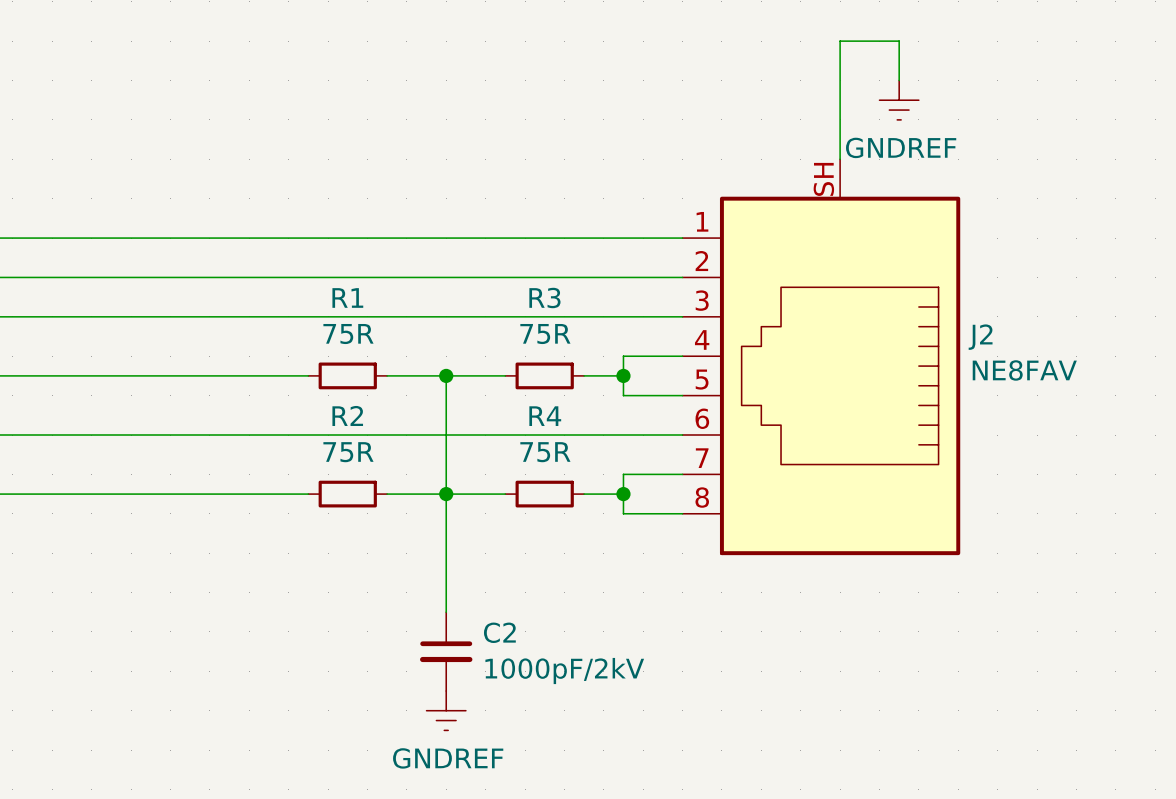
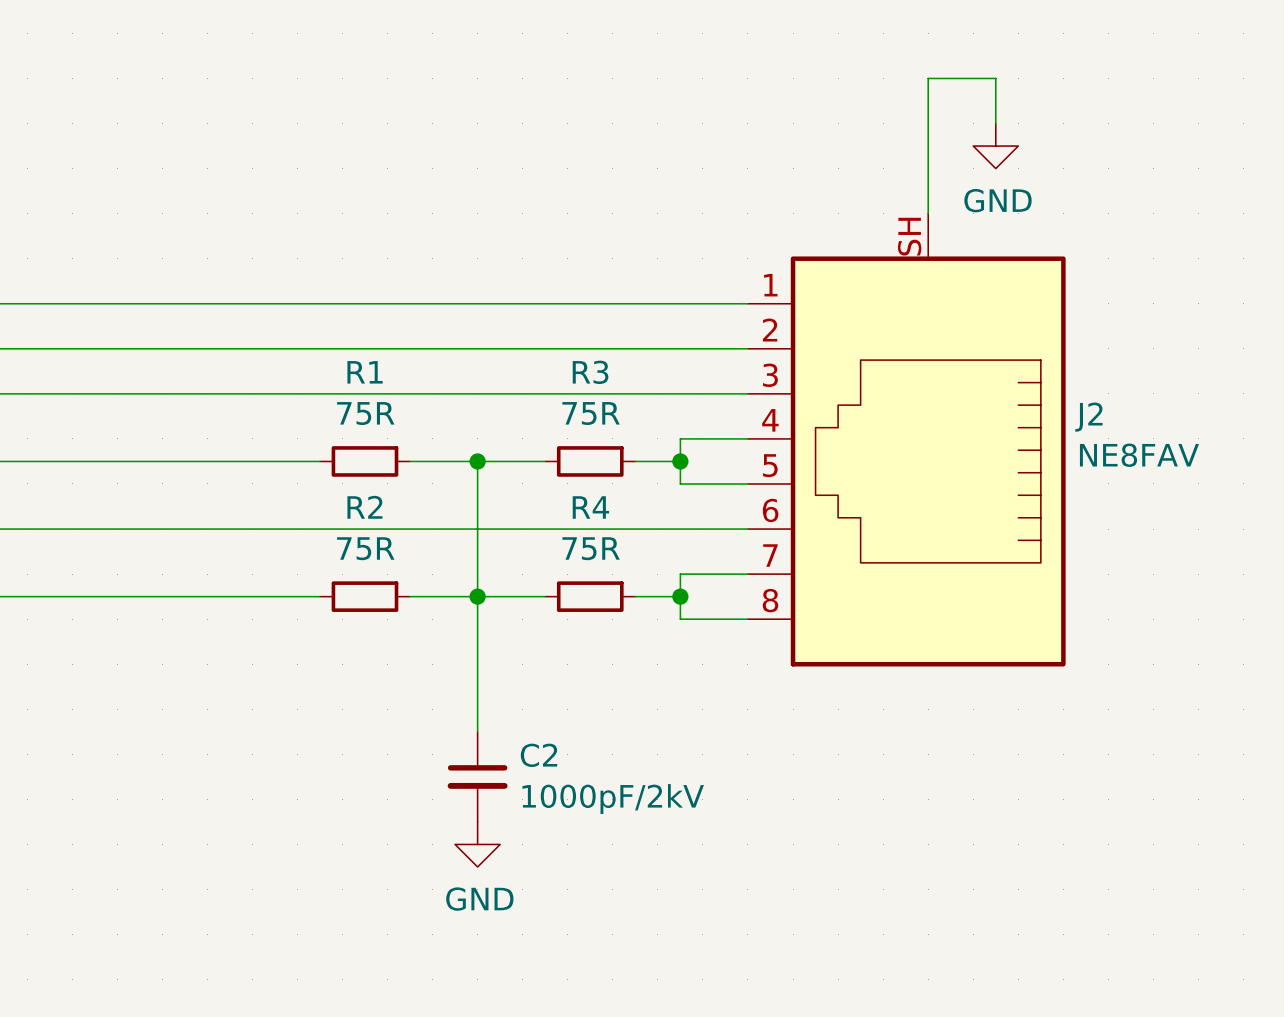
power symbol: GNDREF (899, 100) -> GND (995, 146)
power symbol: GNDREF (446, 710) -> GND (477, 844)

